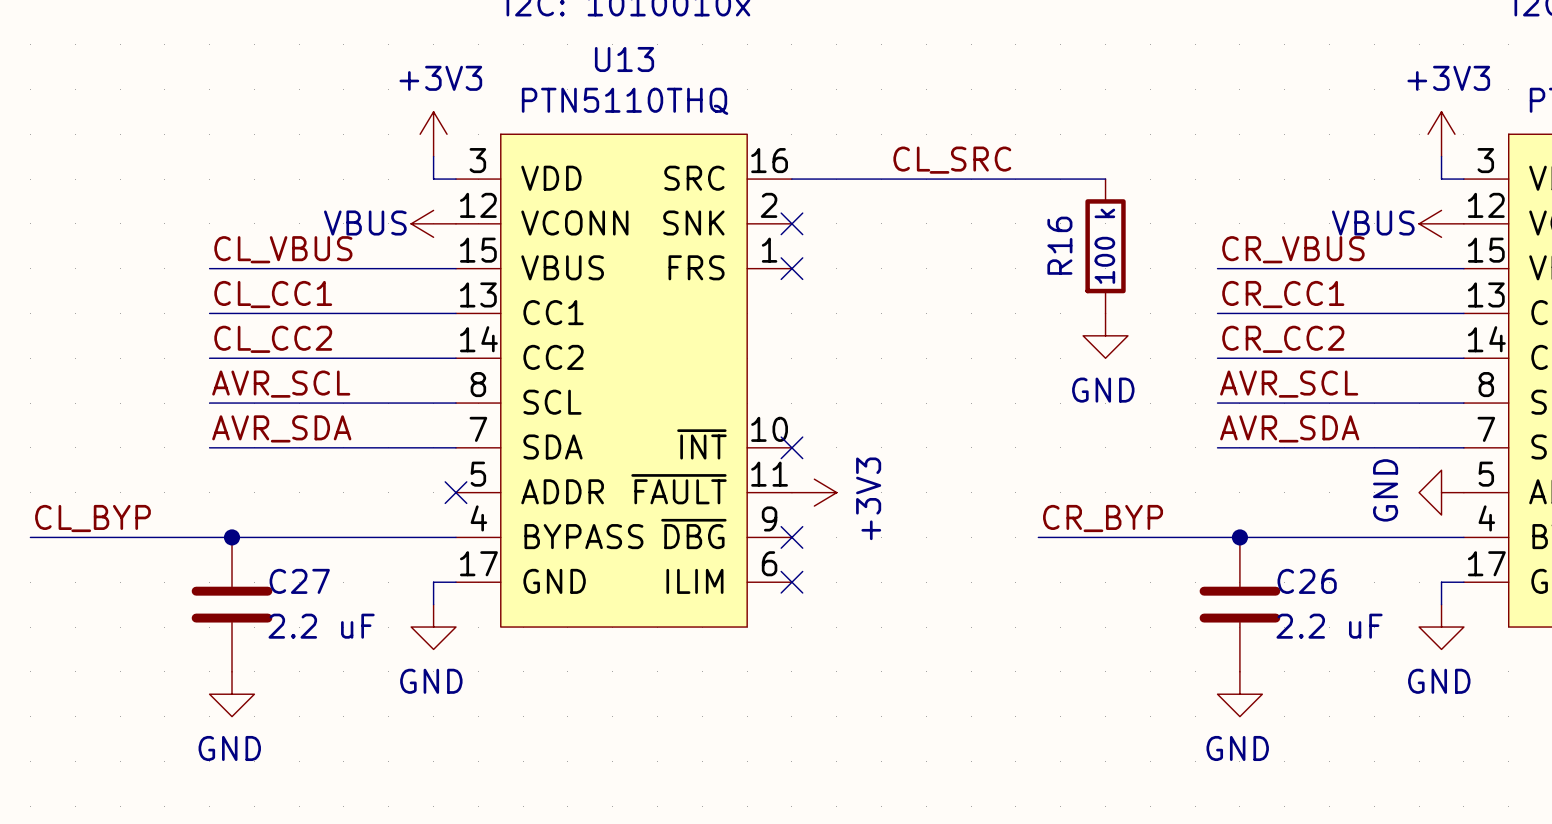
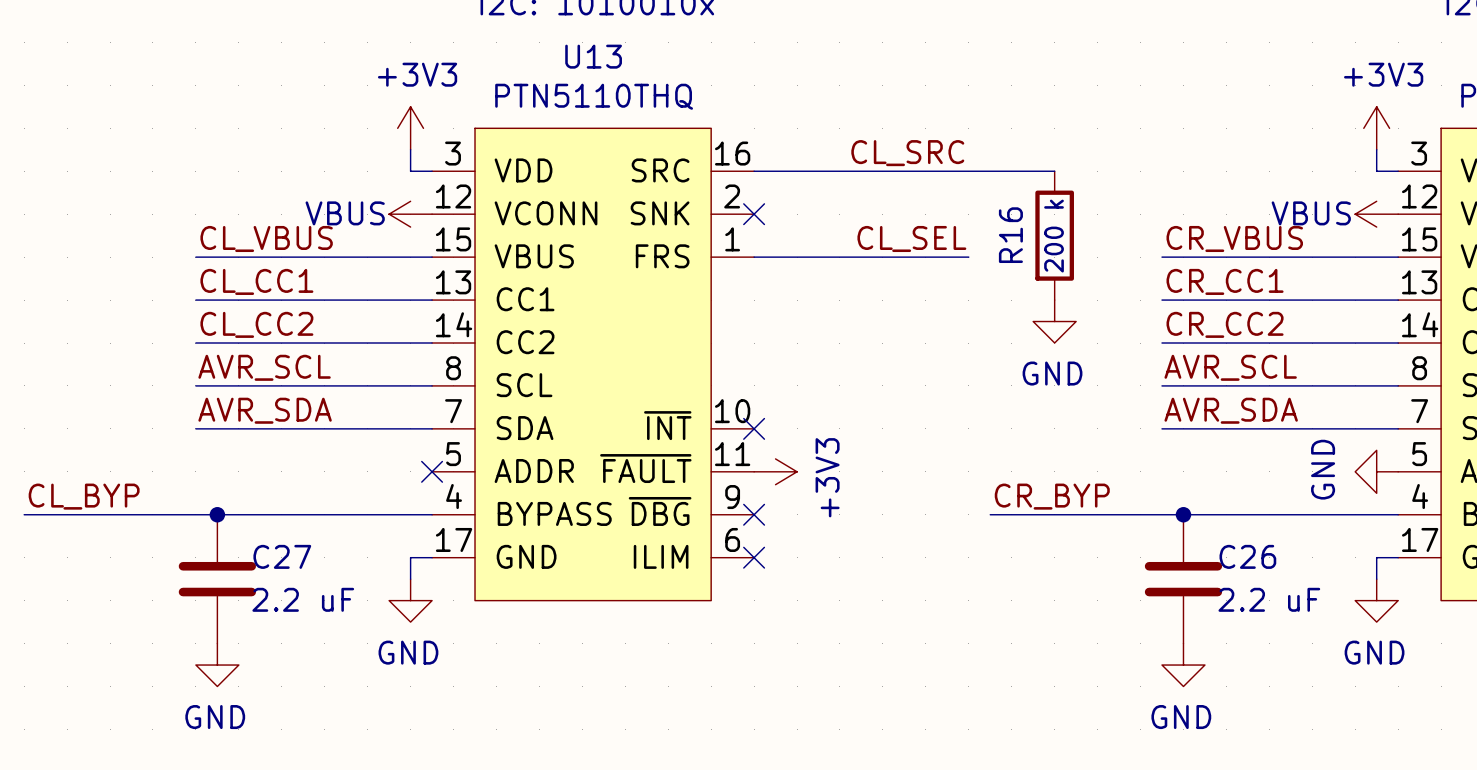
R16 value: 100 k (1104, 246) -> 200 k (1054, 236)
label: none -> CL_SEL (911, 238)
wire: none -> (754, 257) (968, 257)
no-connect mark: (791, 268) -> none

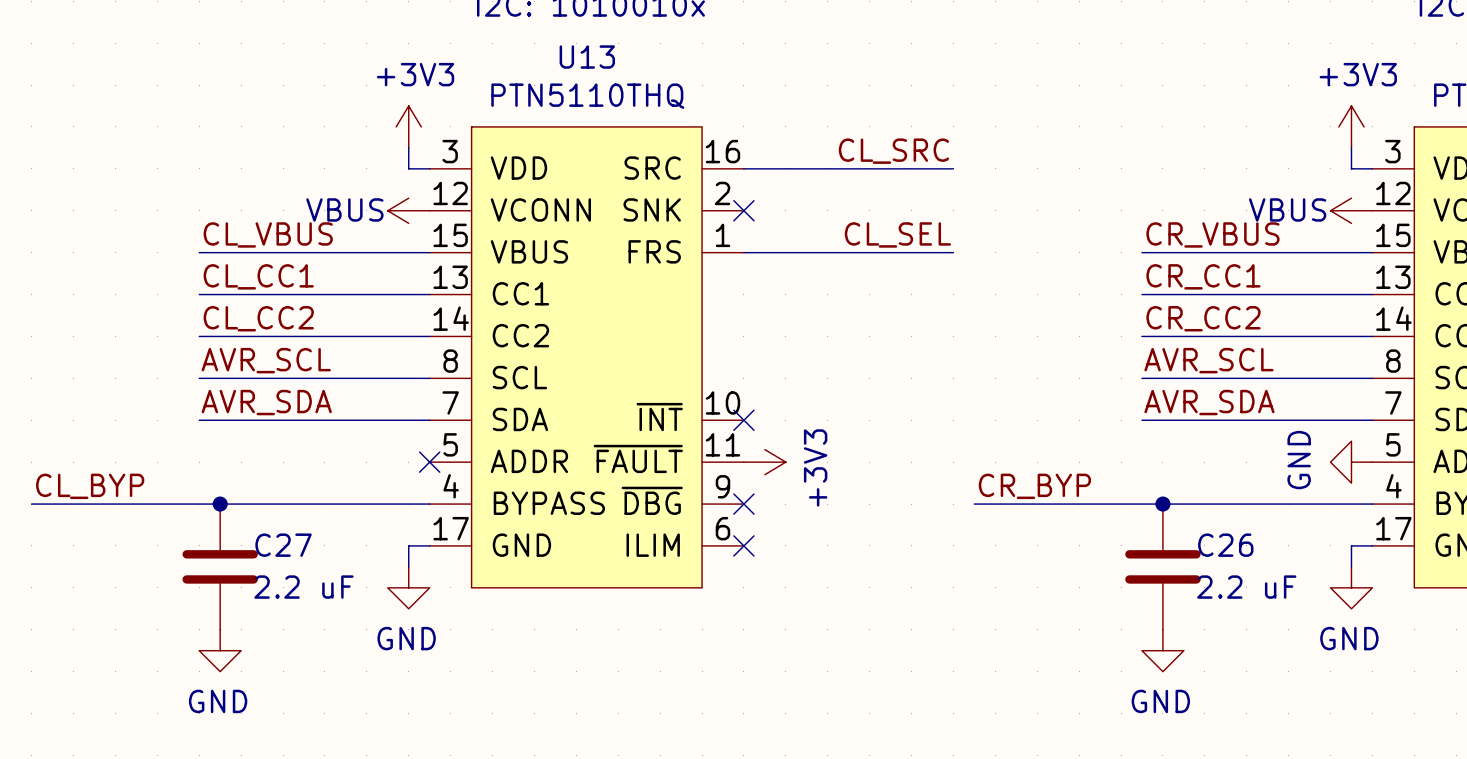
wire: (968, 171) (1054, 171) -> none
R16: 200 k (1054, 235) -> none
power symbol: GND (1054, 321) -> none

